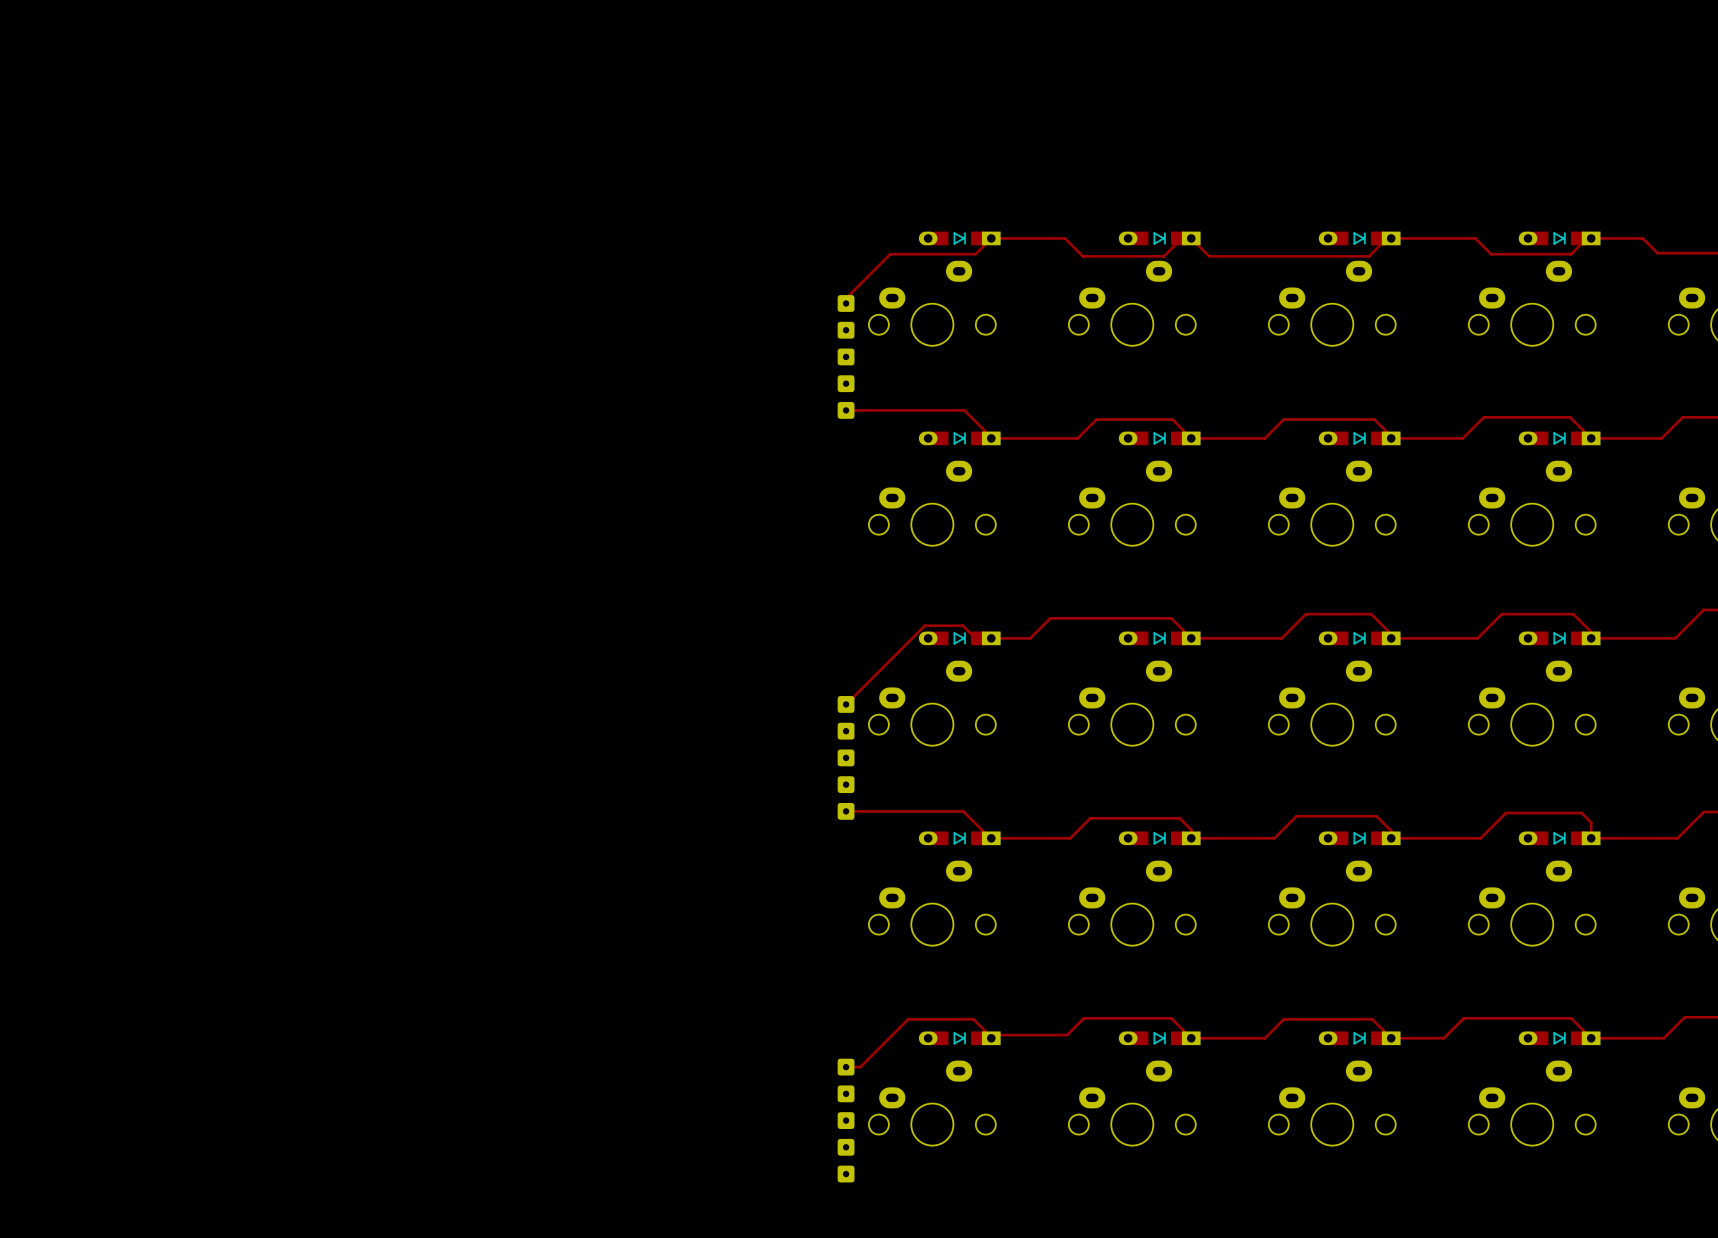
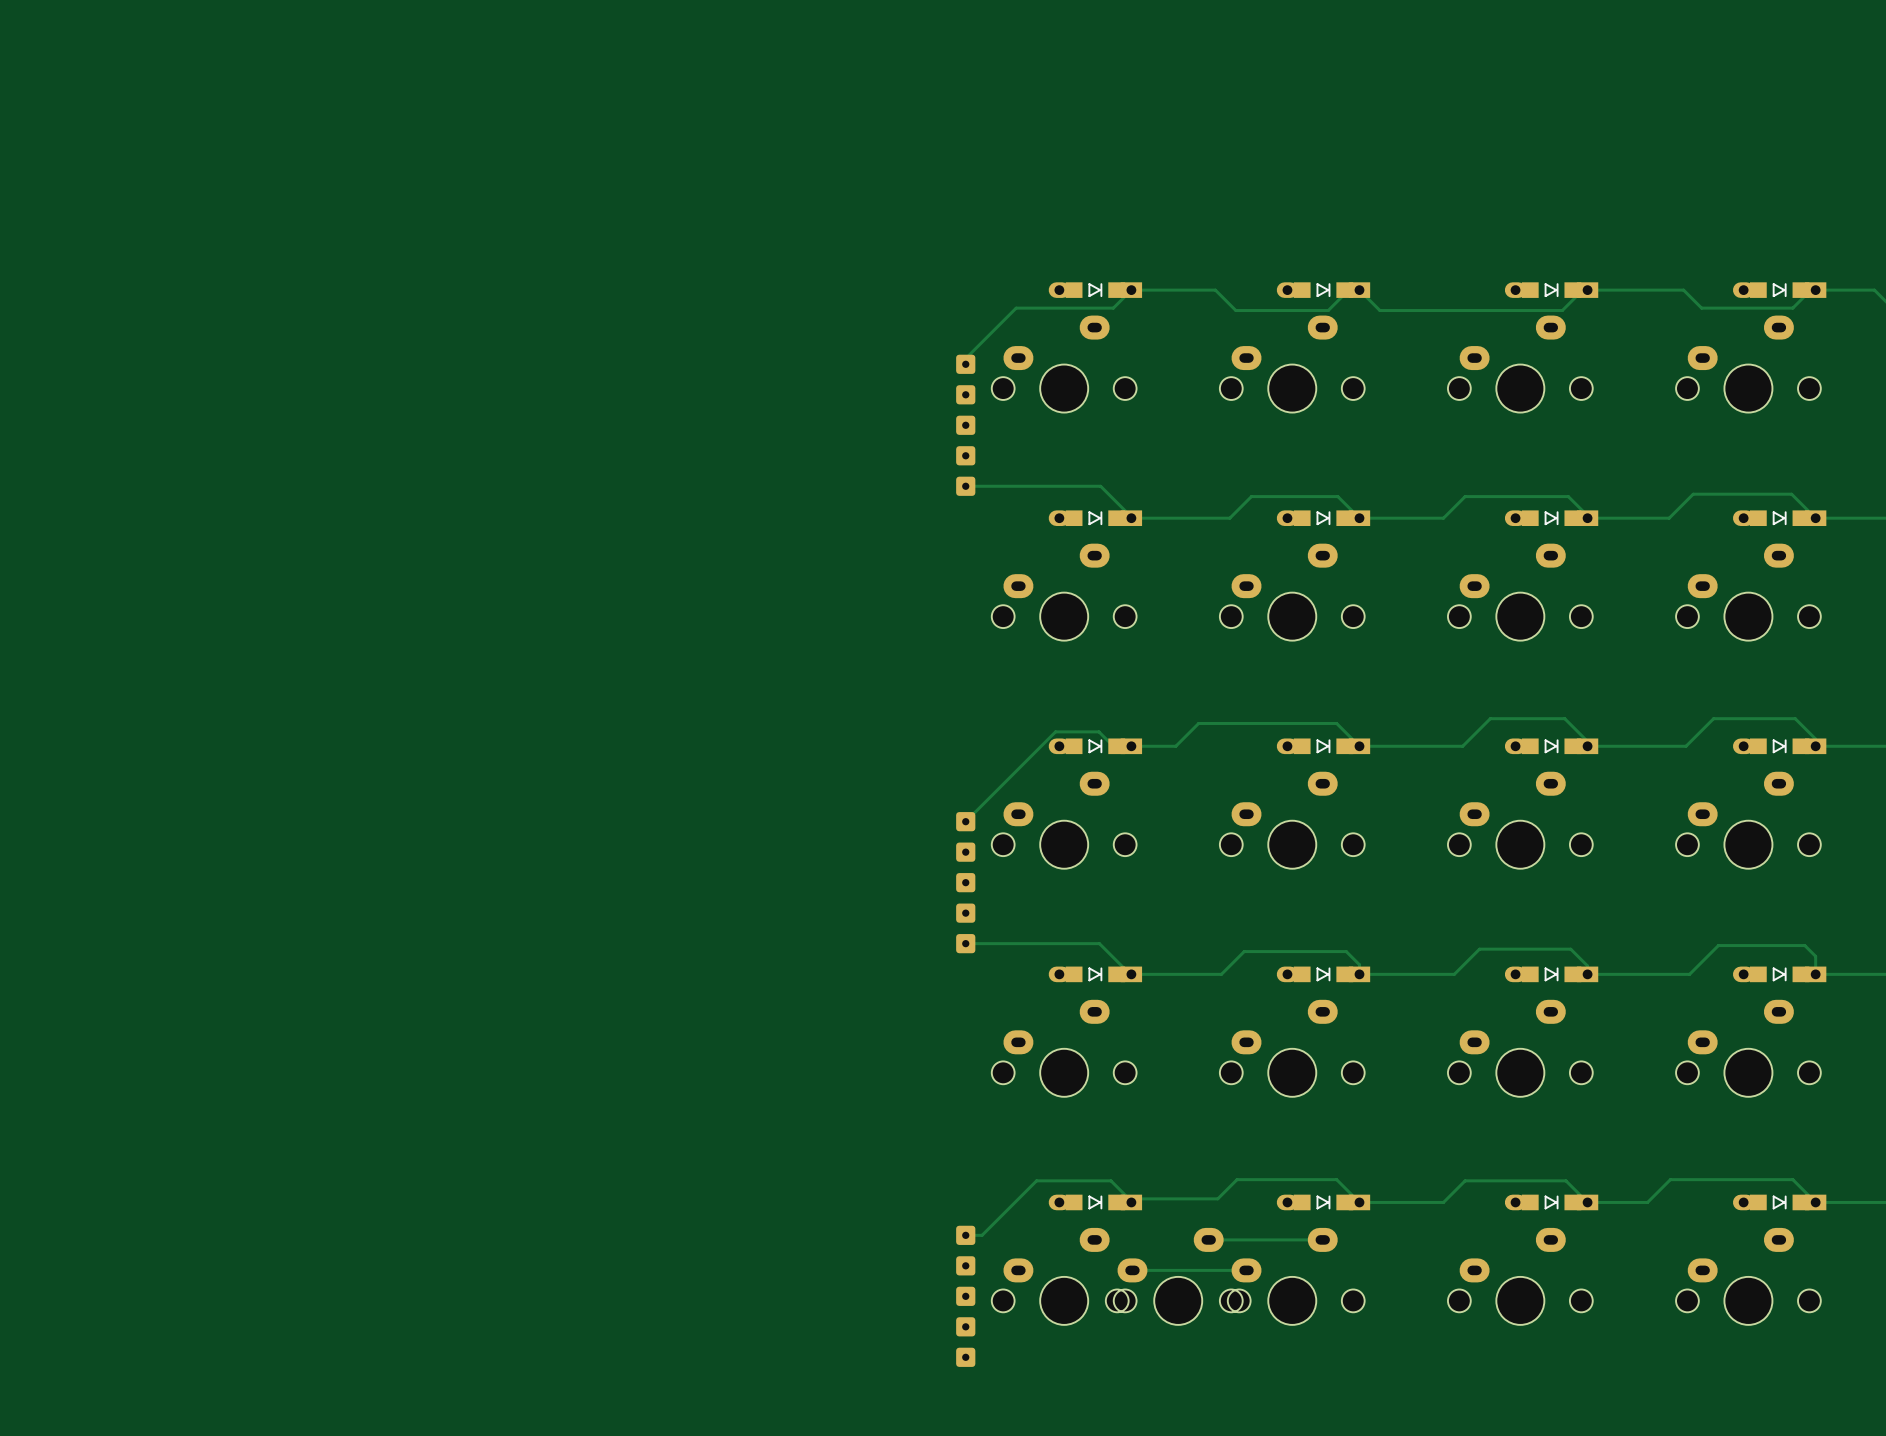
track: none -> (1208, 1239) (1322, 1239)
track: none -> (1132, 1270) (1246, 1270)
part: none -> (1178, 1276)

